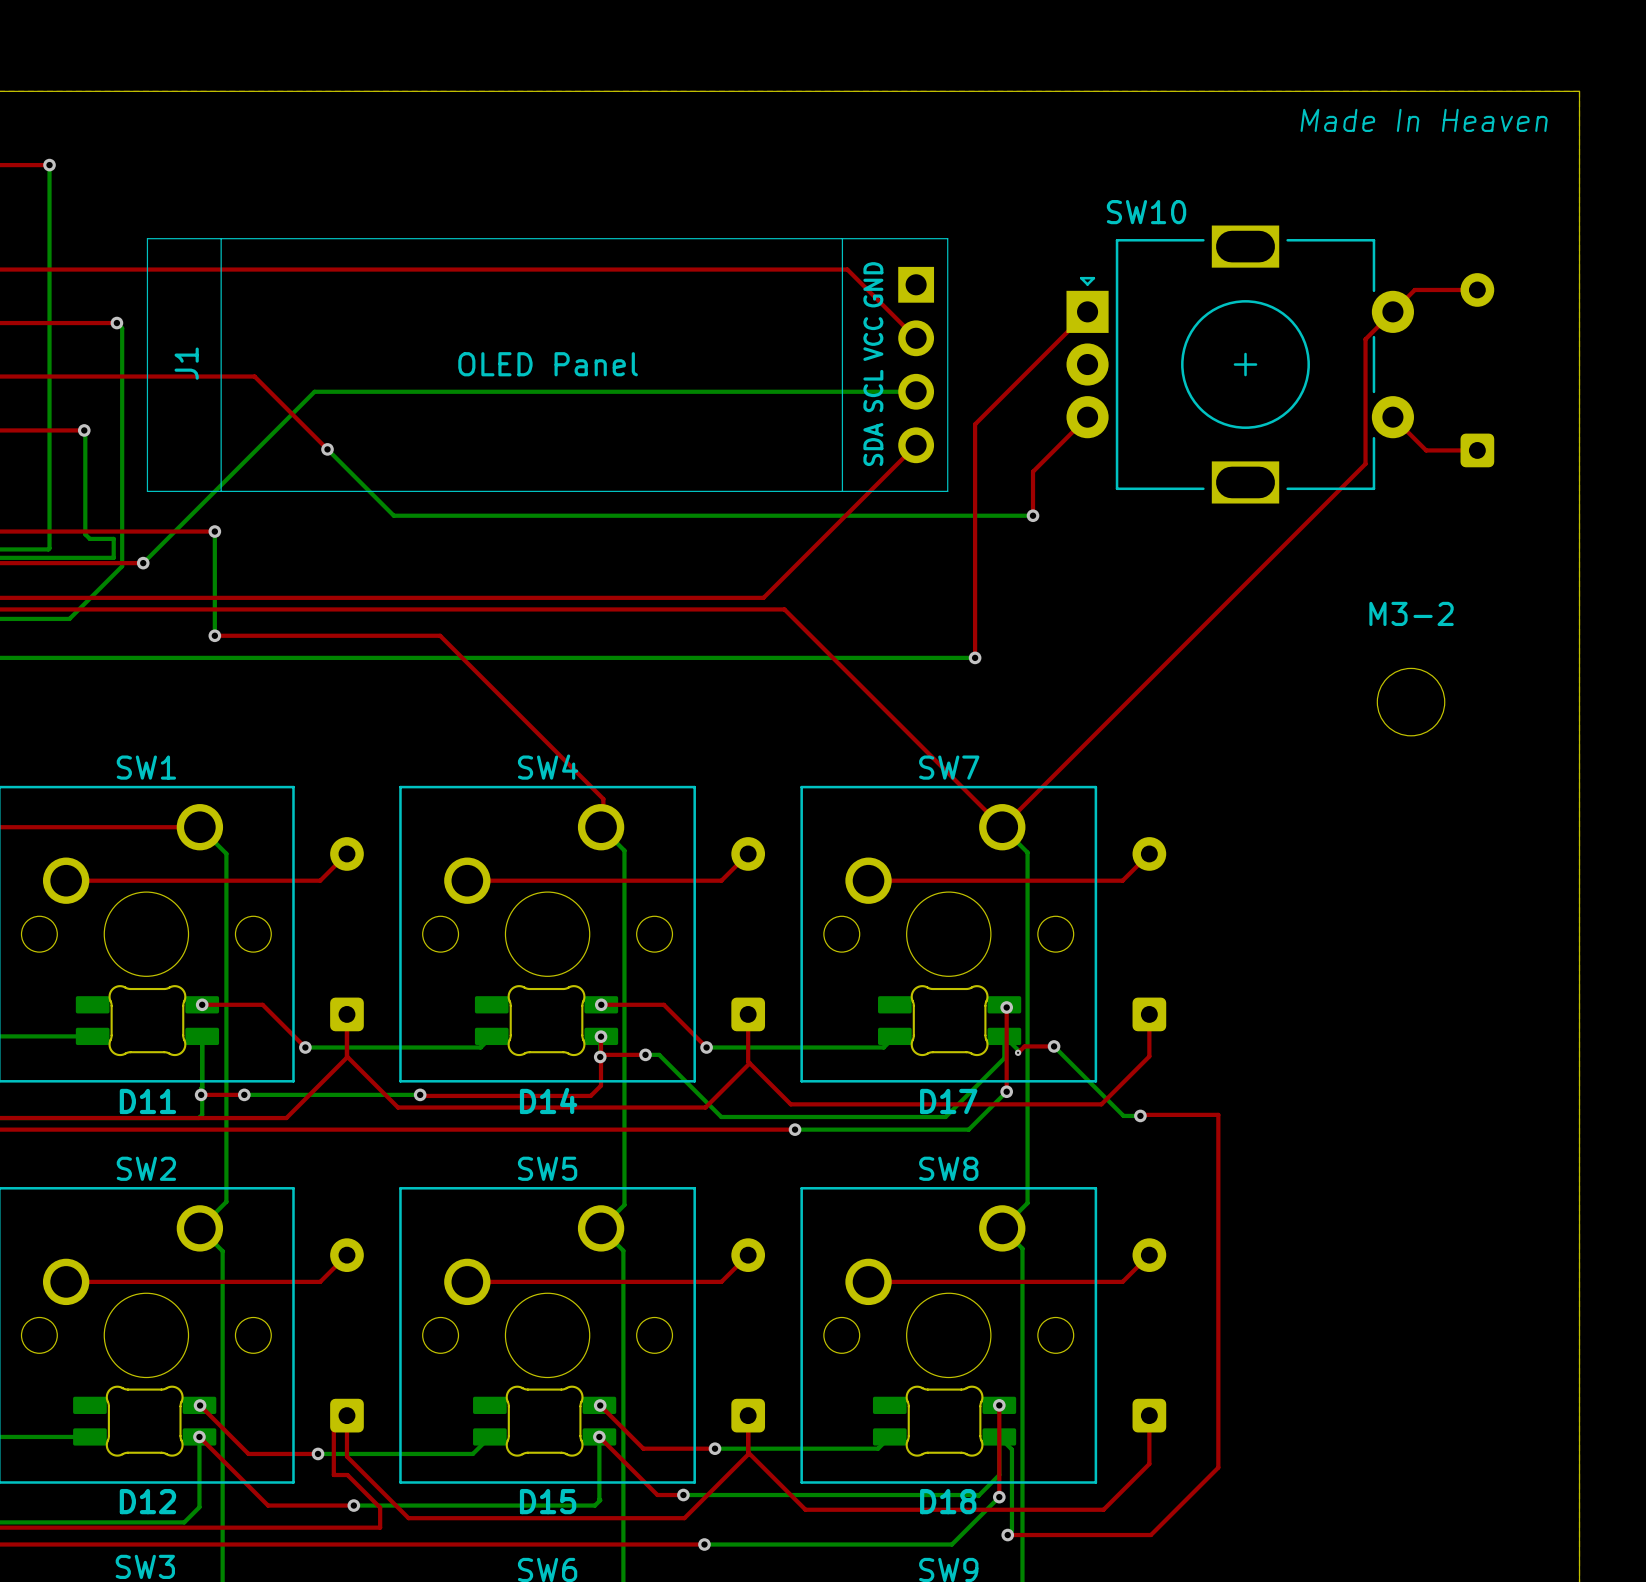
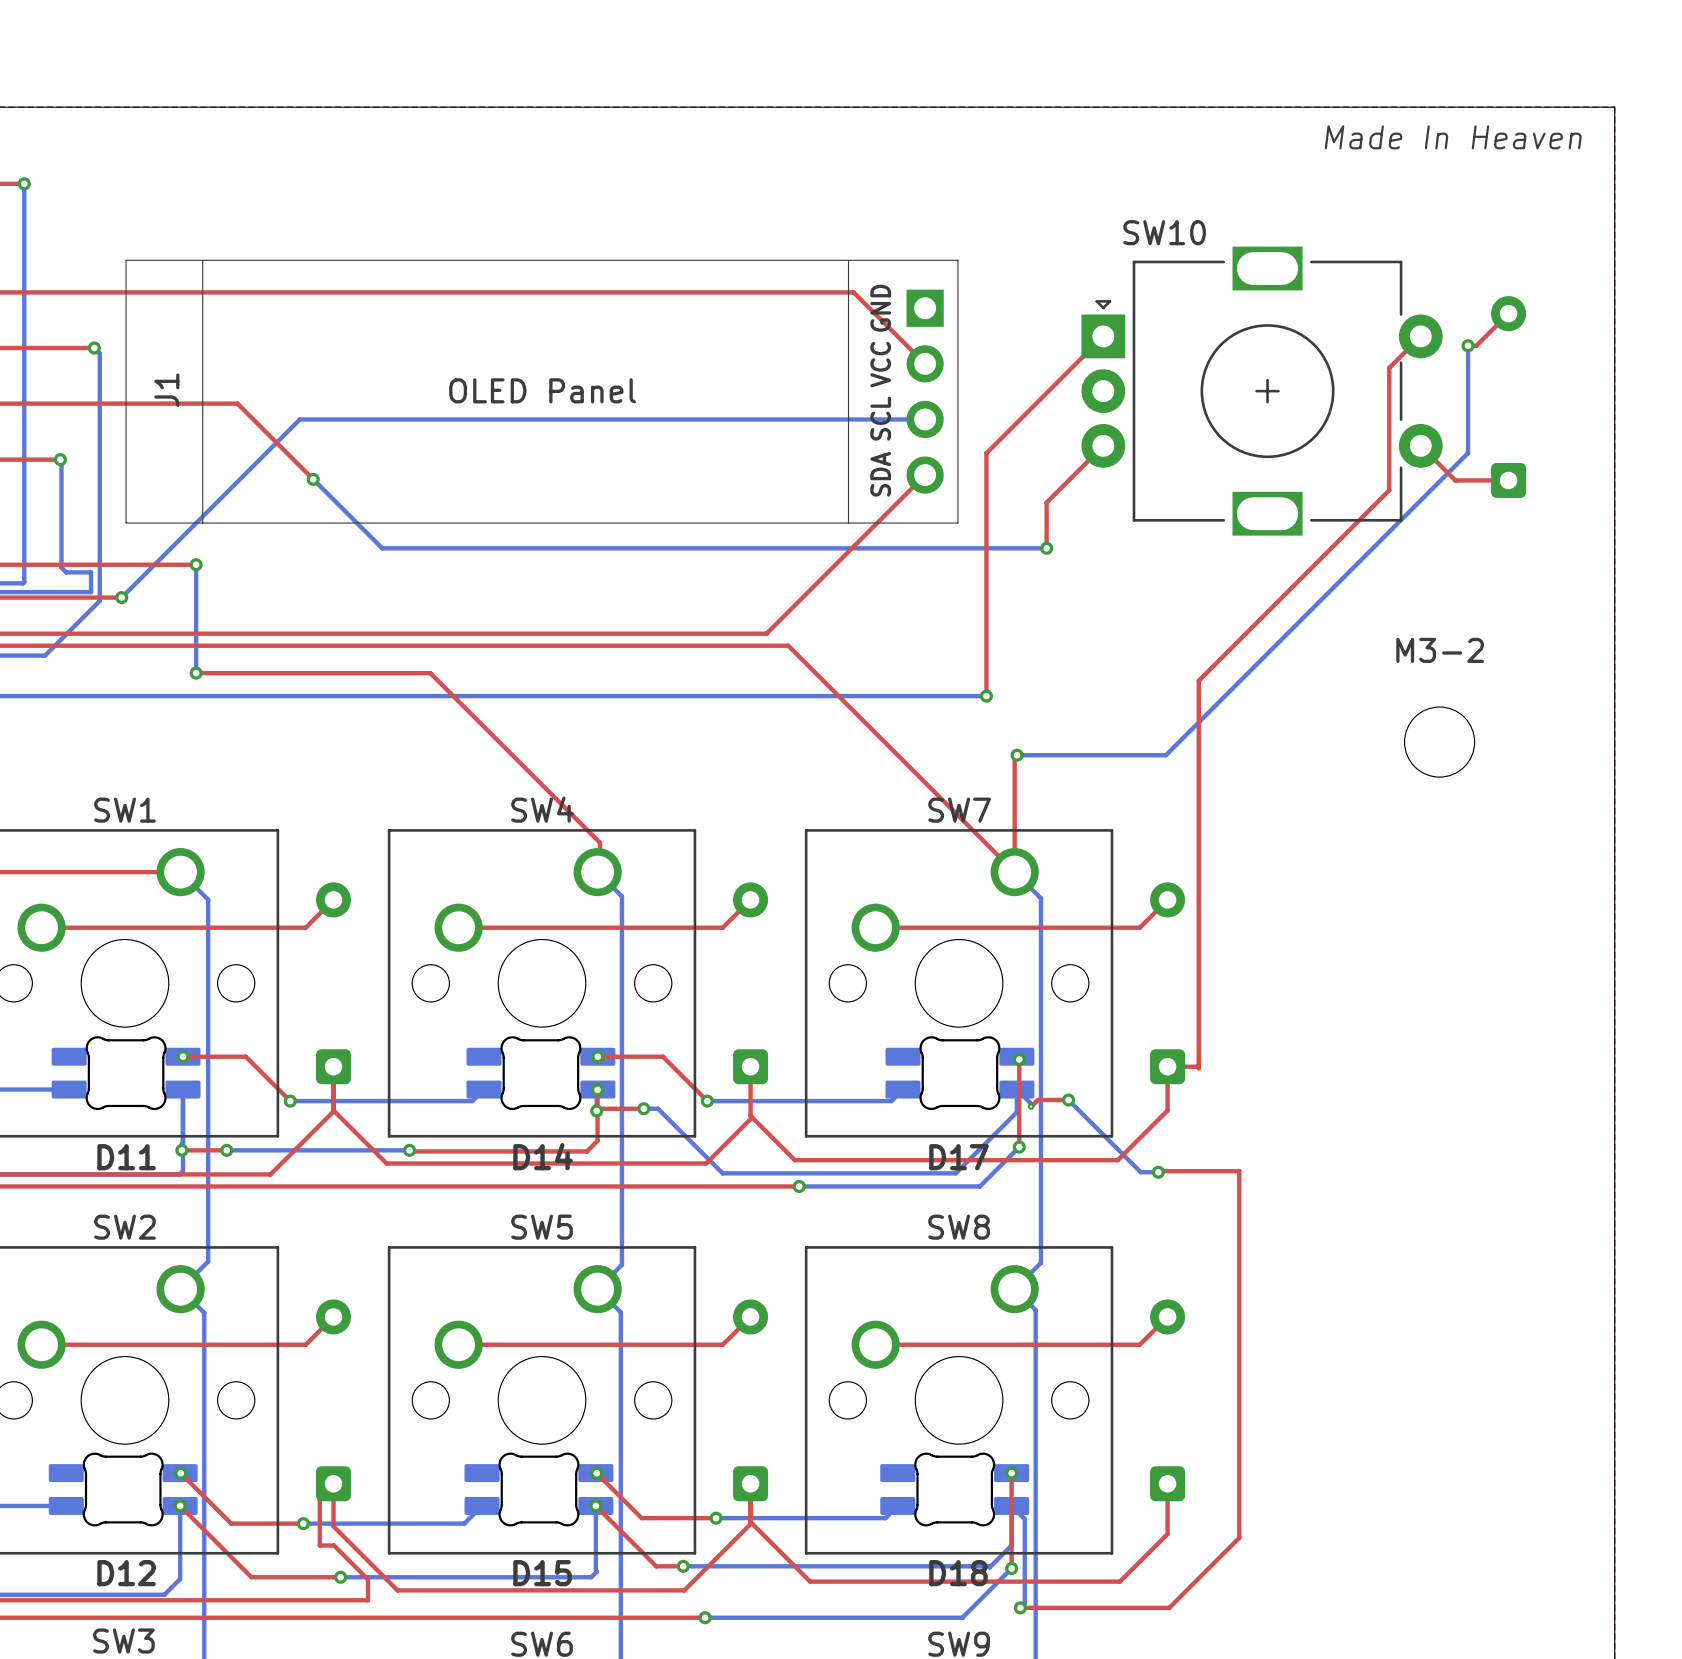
top track: (1477, 289) (1414, 289) (1392, 311) -> (1508, 313) (1476, 345) (1468, 345)
bottom track: none -> (1468, 345) (1468, 453) (1165, 755) (1017, 755)
via: none -> (1468, 345)
top track: (1365, 339) (1365, 463) (1002, 827) -> (1392, 364) (1389, 367) (1389, 490) (1198, 680) (1198, 1068) (1167, 1066)
top track: none -> (1017, 755) (1014, 757) (1014, 872)
via: none -> (1017, 755)

